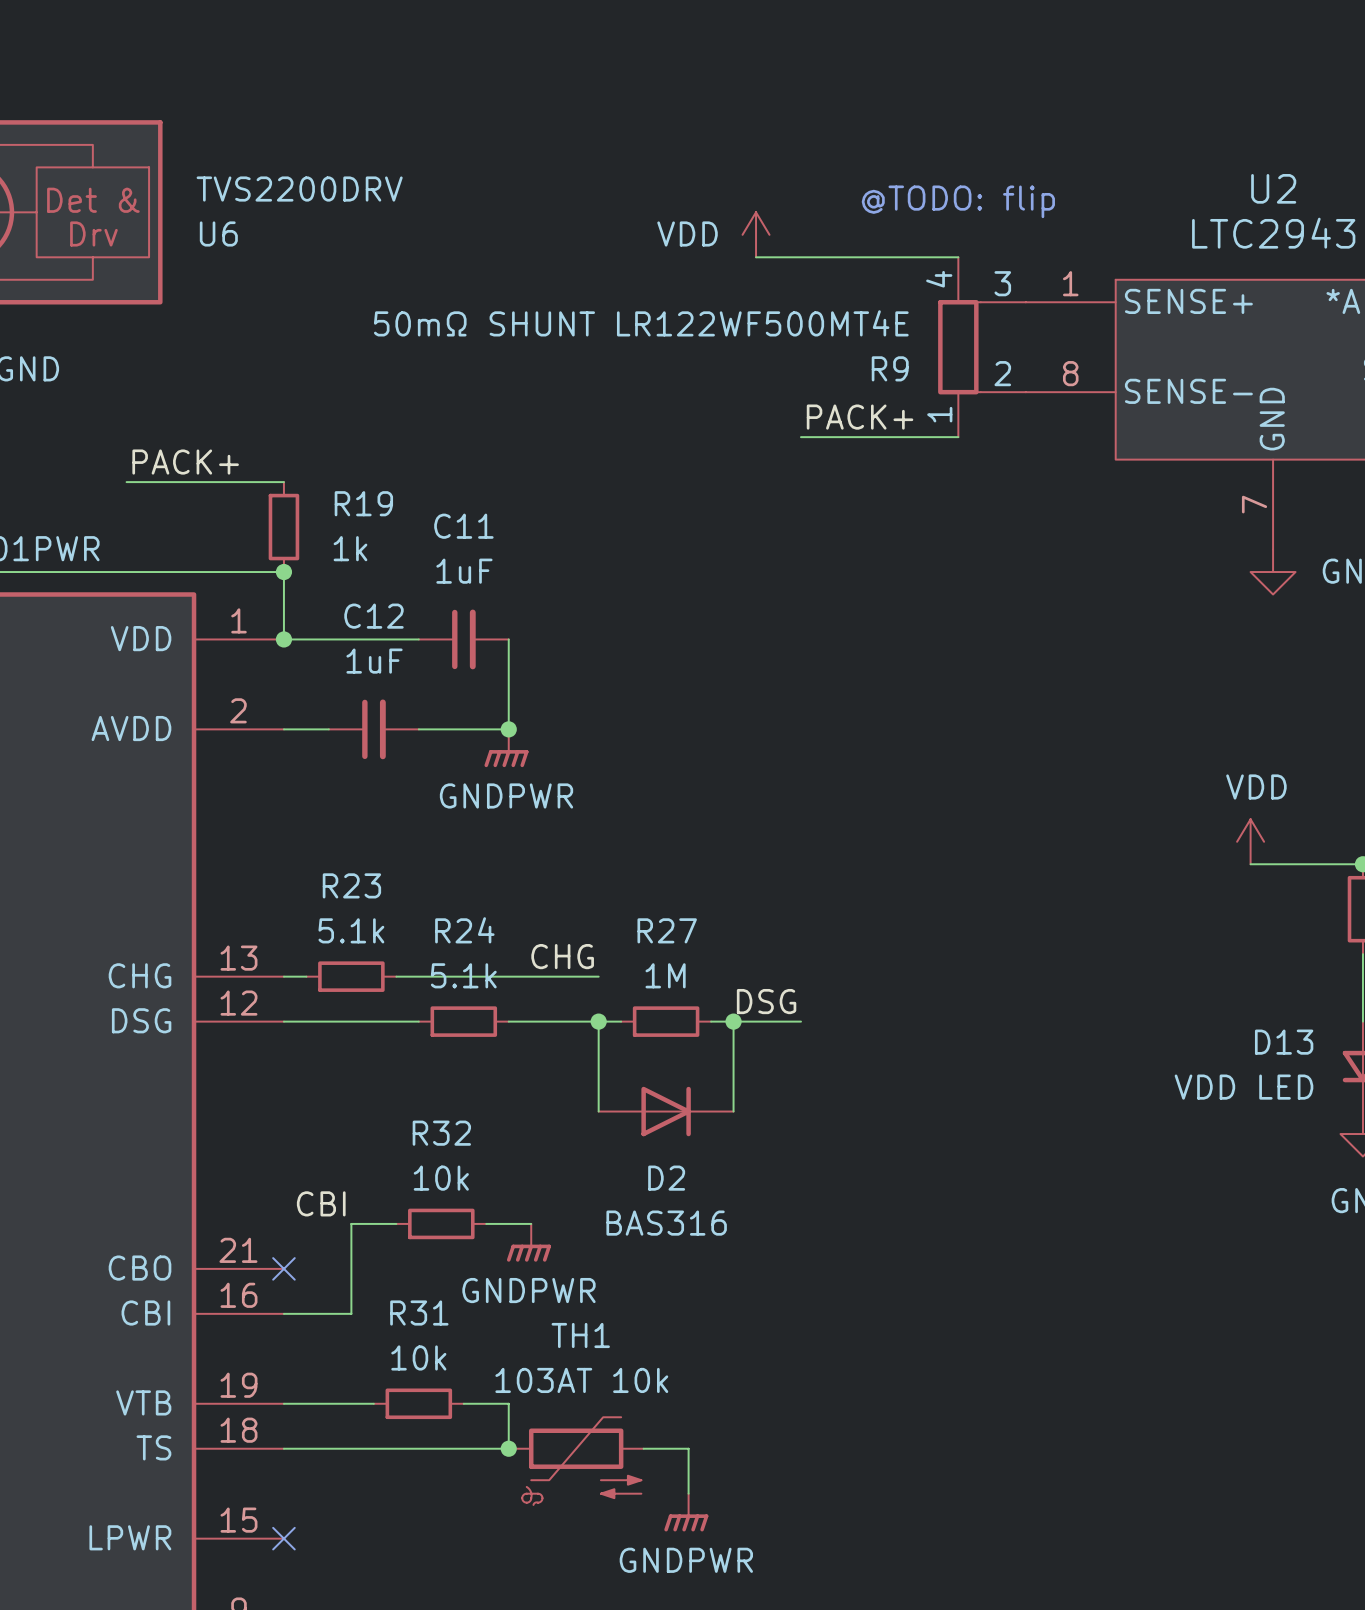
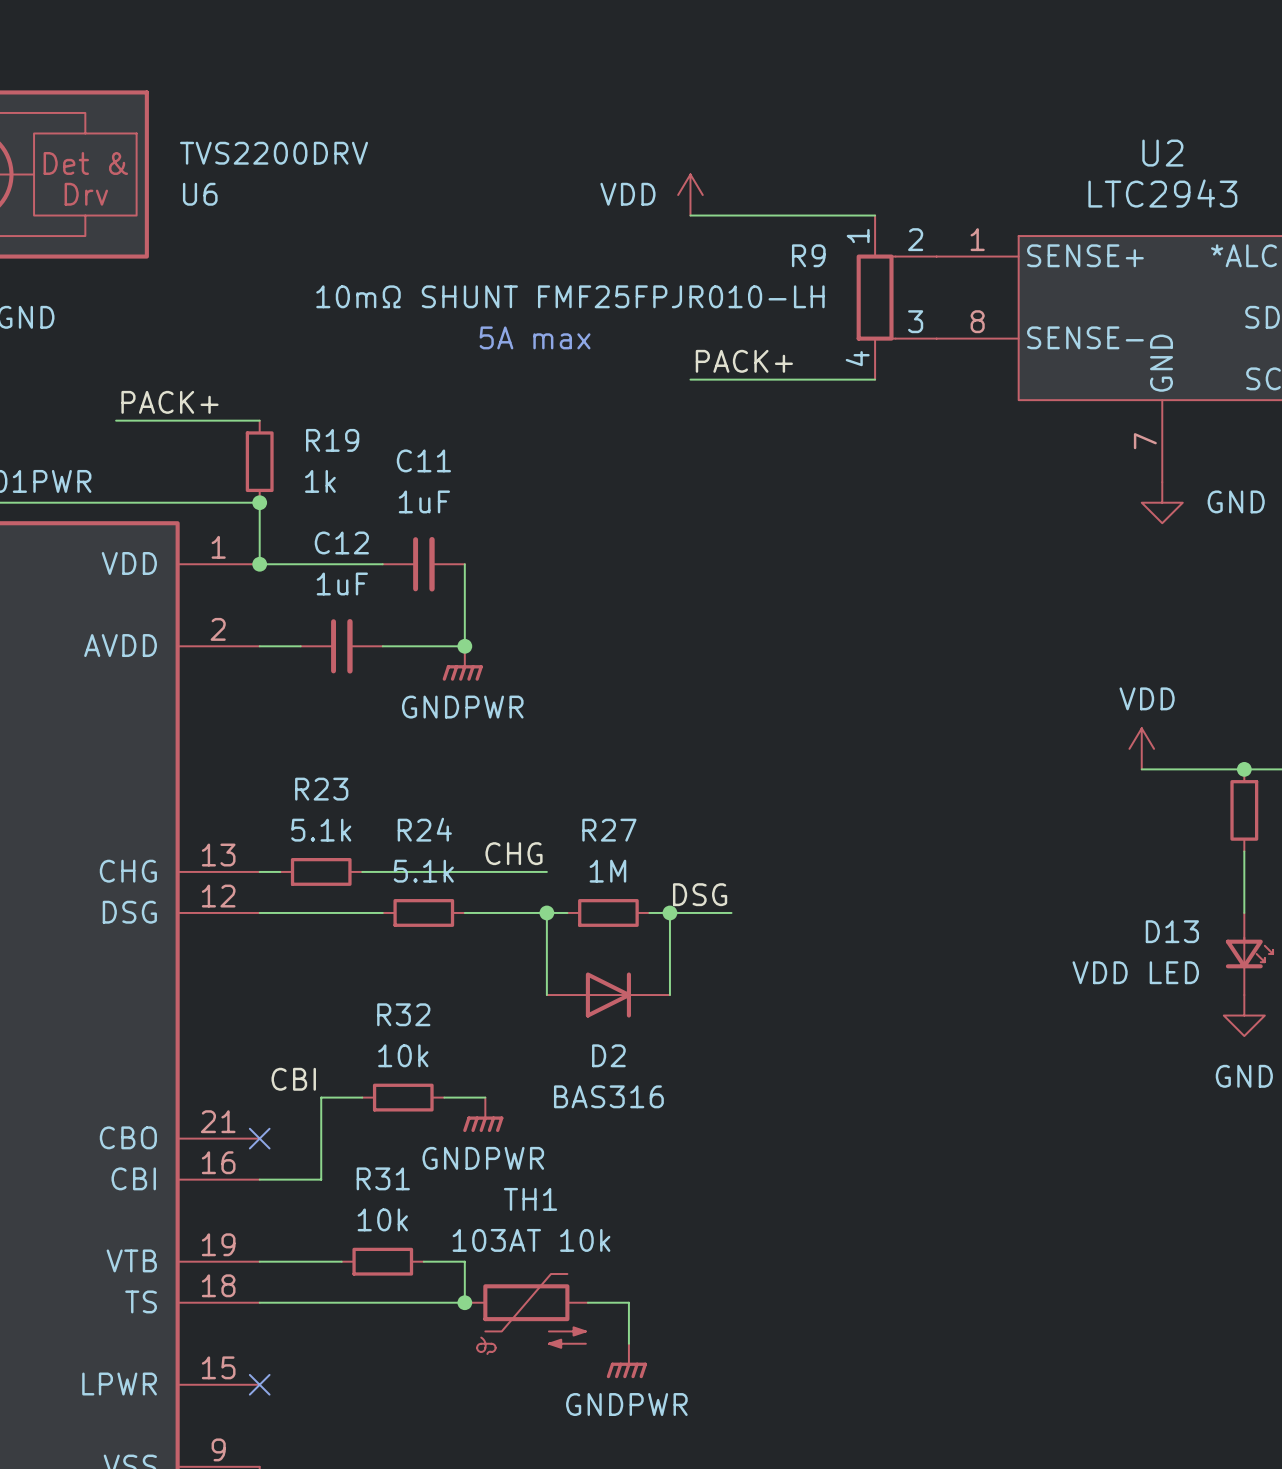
text: @TODO: flip (958, 201) -> none
R9 value: 50mΩ SHUNT LR122WF500MT4E (641, 323) -> 10mΩ SHUNT FMF25FPJR010-LH (570, 296)
R9 flip: as is (959, 347) -> up-down (876, 297)
text: none -> 5A max (535, 337)
label position: PACK+ (860, 417) -> PACK+ (744, 361)
wire: none -> (690, 379) (731, 379)

